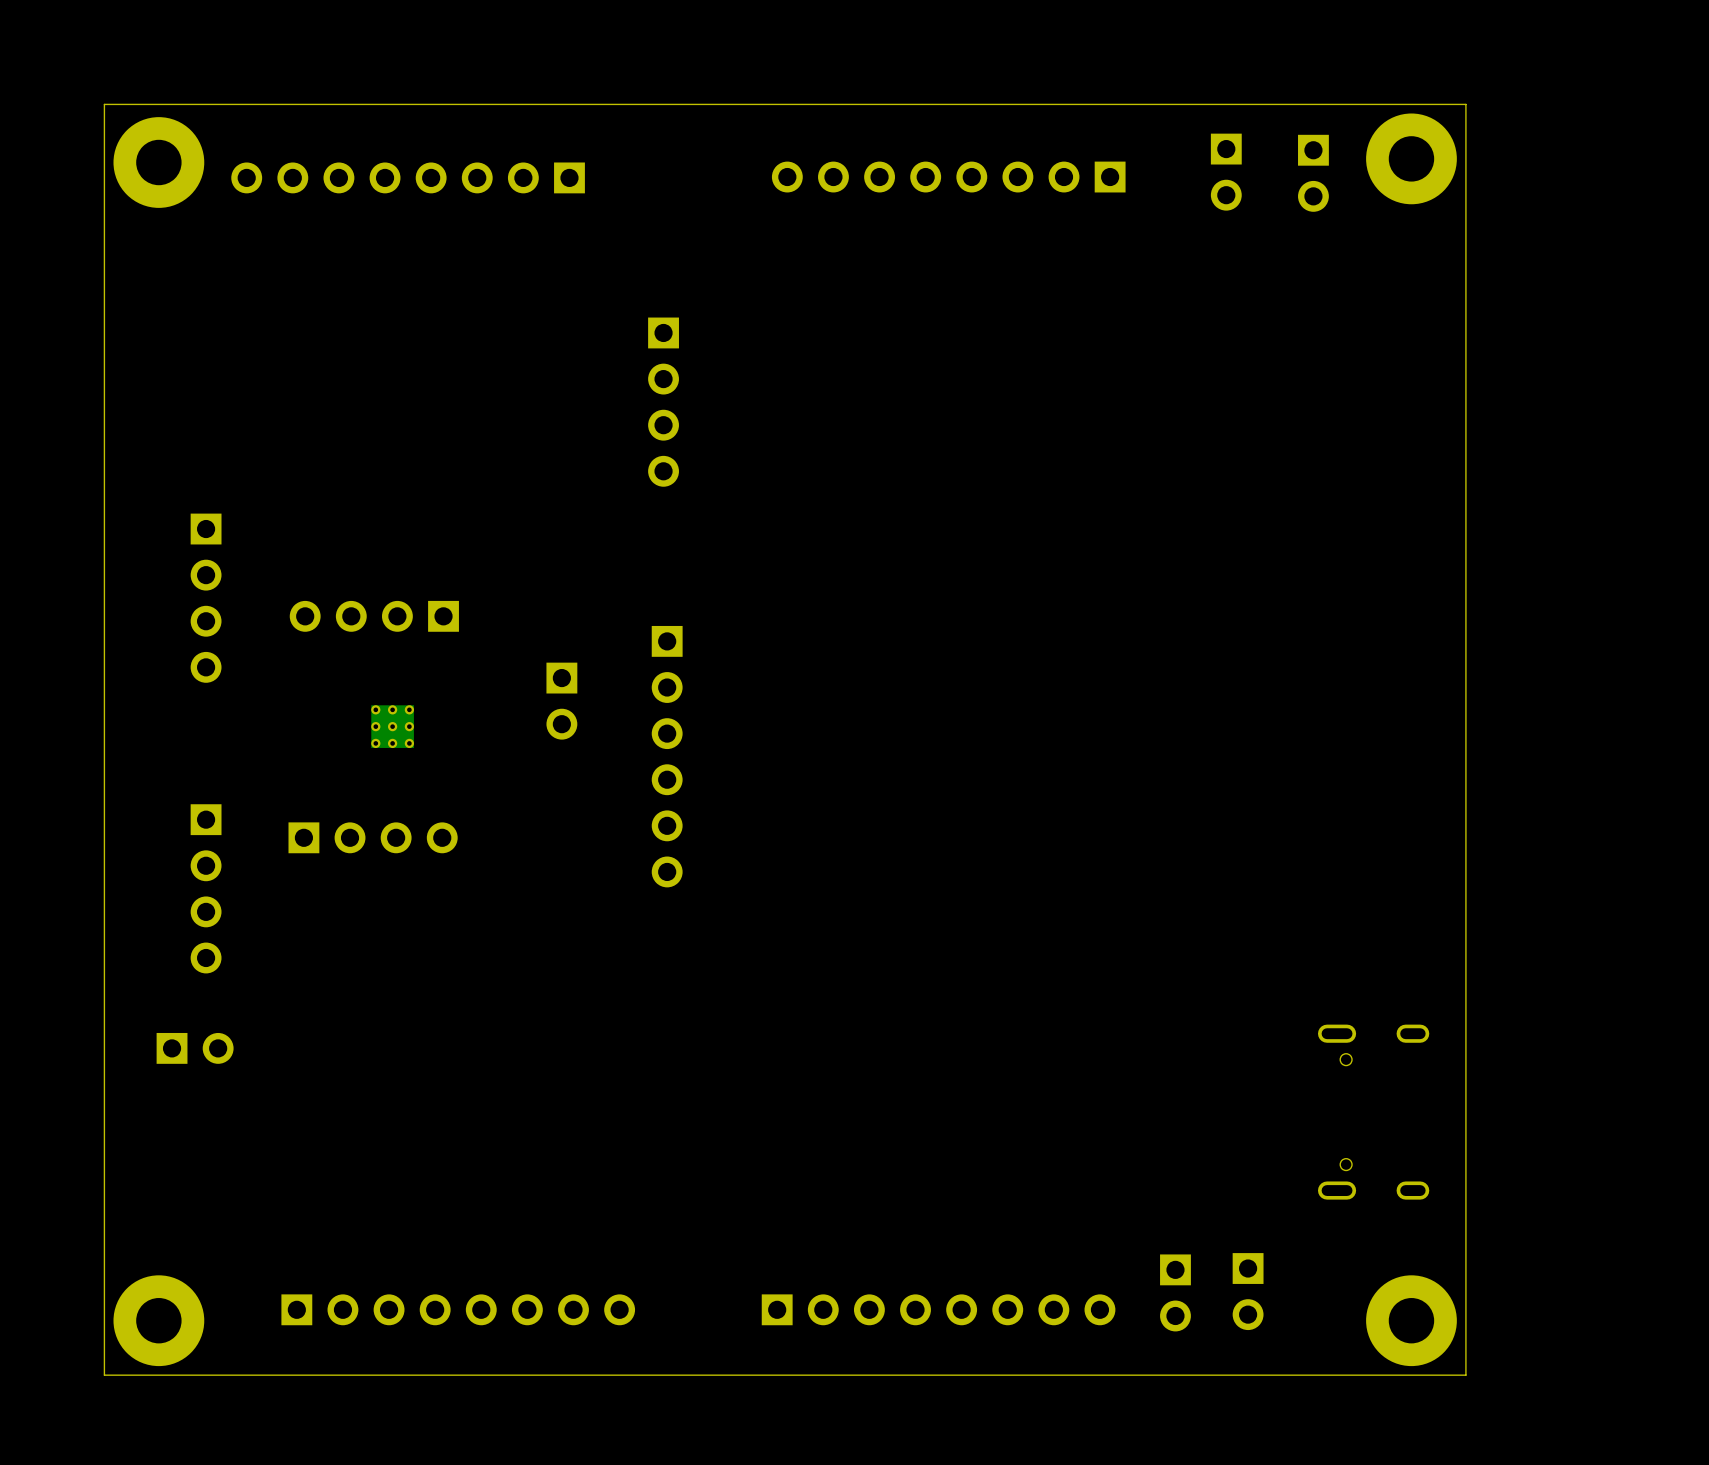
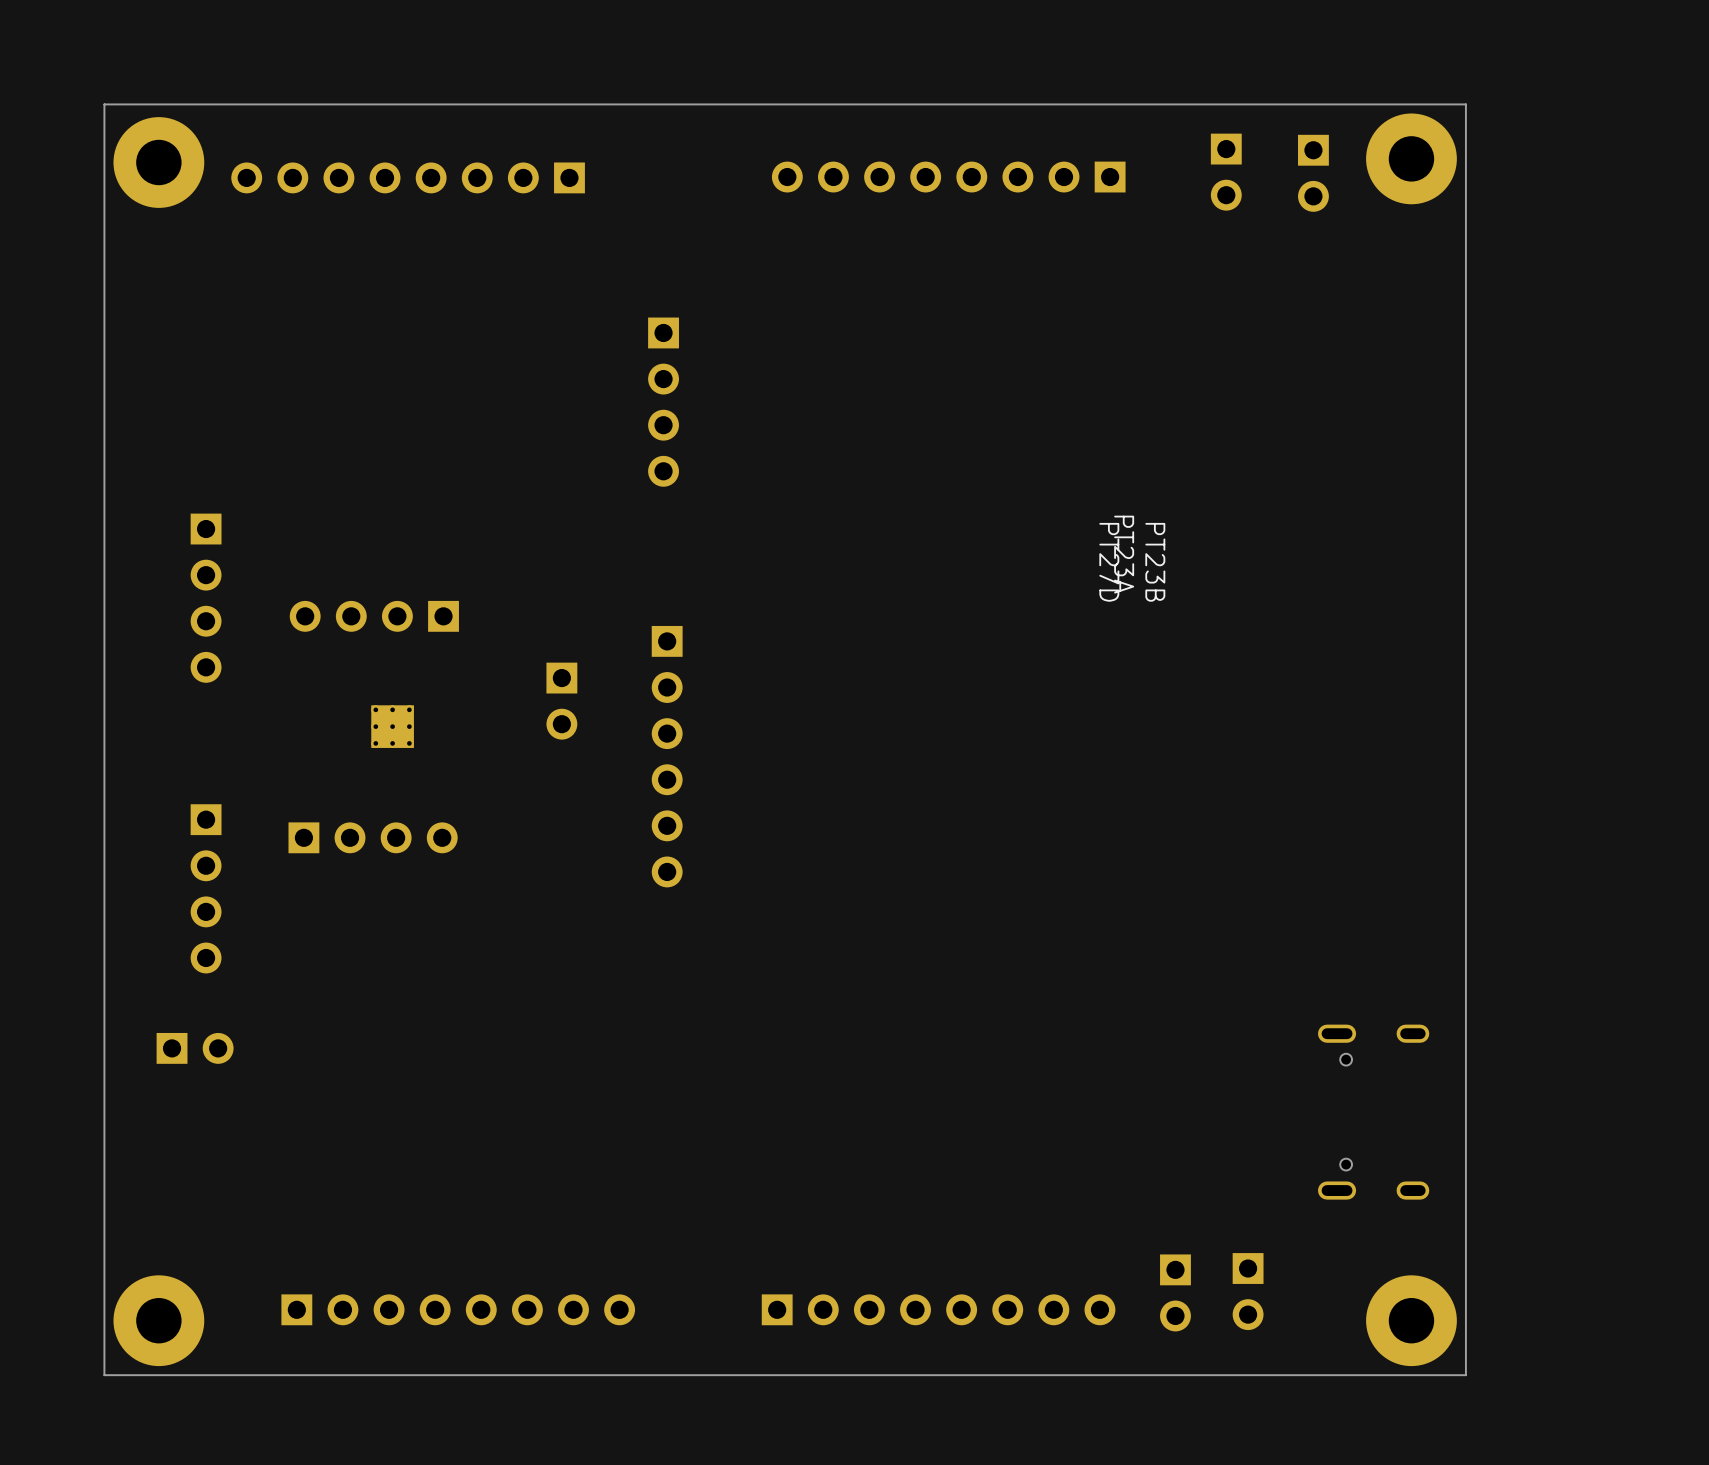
text: none -> PT23A (1124, 554)
text: none -> PT27D (1109, 562)
text: none -> PT23B (1155, 562)

